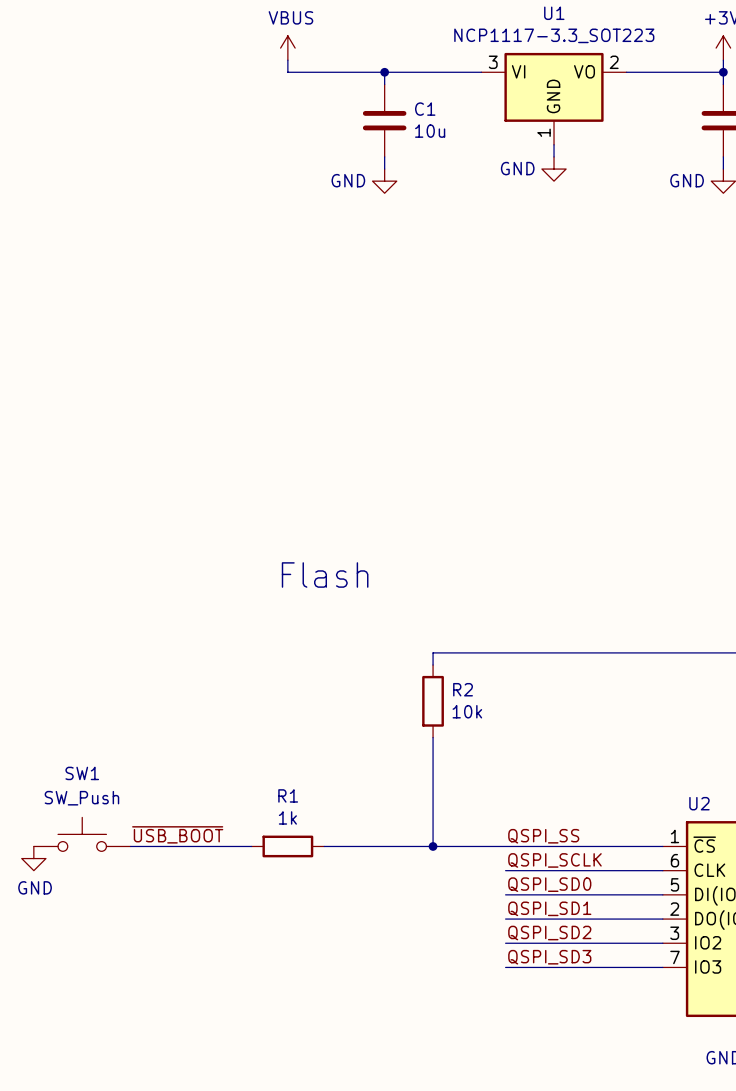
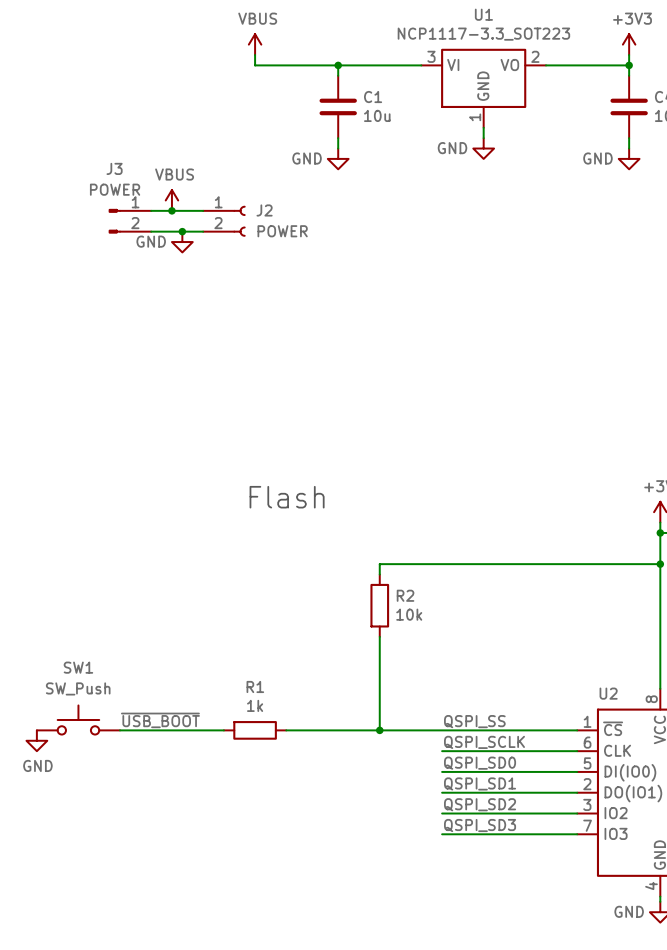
power symbol: none -> VBUS (171, 200)
wire: none -> (151, 210) (203, 210)
junction: none -> (171, 210)
J3: none -> POWER (130, 221)
J2: none -> POWER (224, 221)
wire: none -> (151, 231) (203, 231)
junction: none -> (182, 231)
power symbol: none -> GND (182, 242)

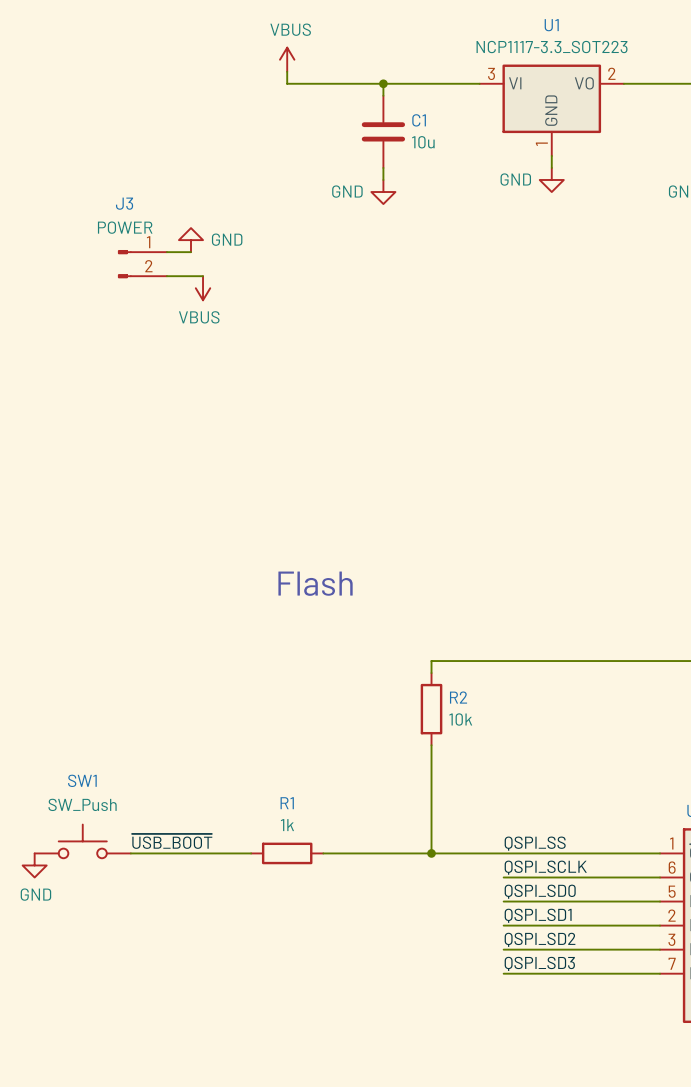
power symbol: VBUS (171, 200) -> GND (190, 240)
wire: (171, 210) (203, 210) -> none
junction: (171, 210) -> none
J2: POWER (224, 221) -> none
wire: (182, 231) (203, 231) -> none
junction: (182, 231) -> none
power symbol: GND (182, 242) -> VBUS (203, 288)

